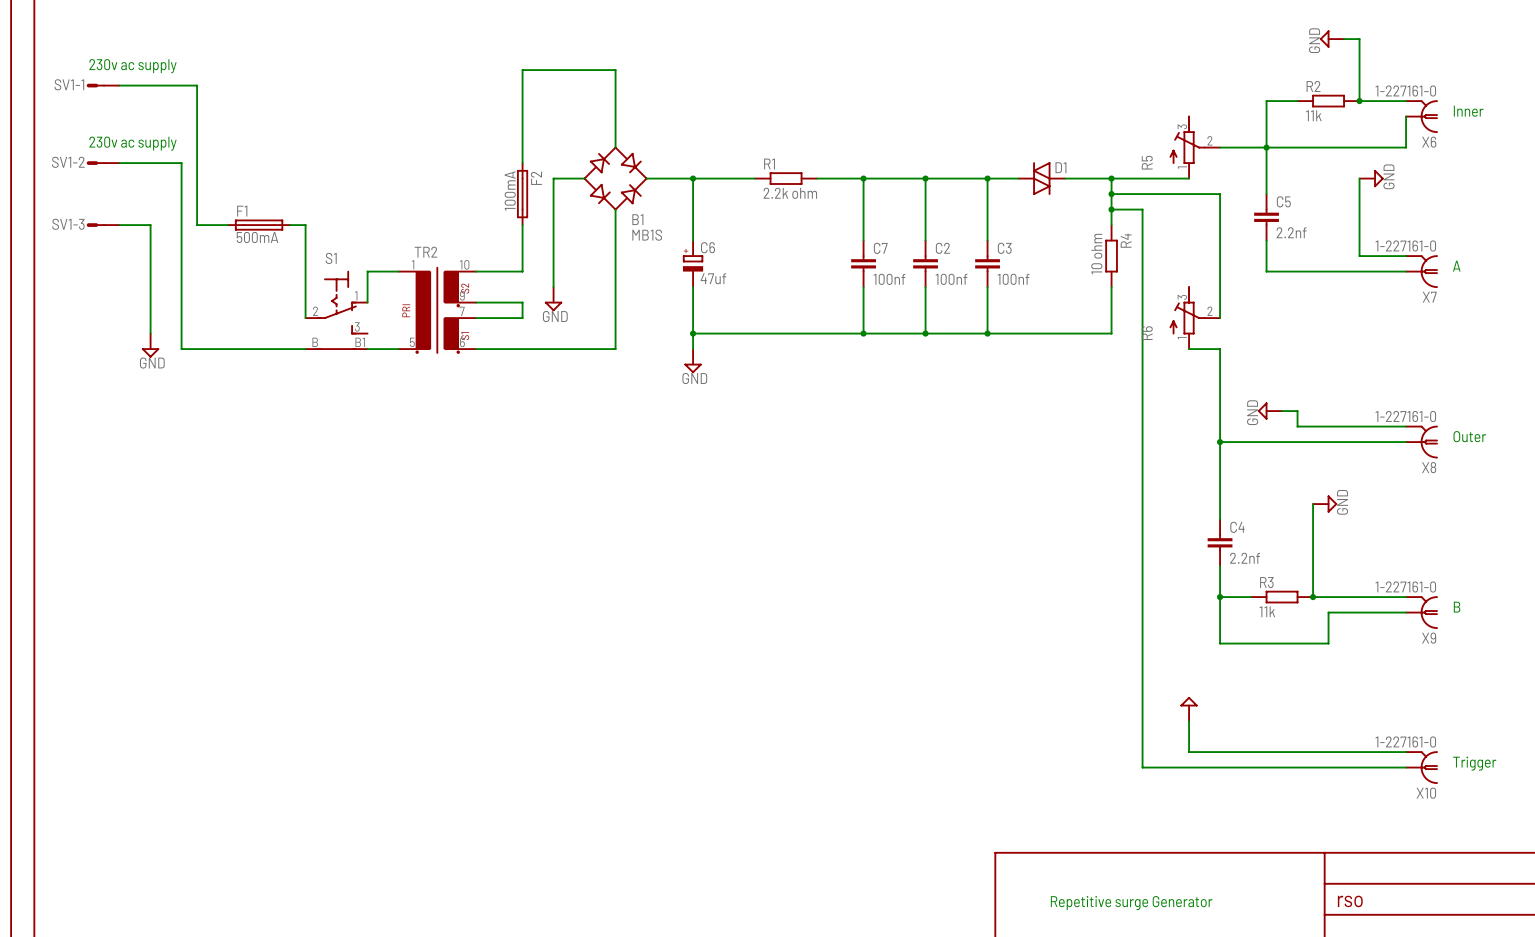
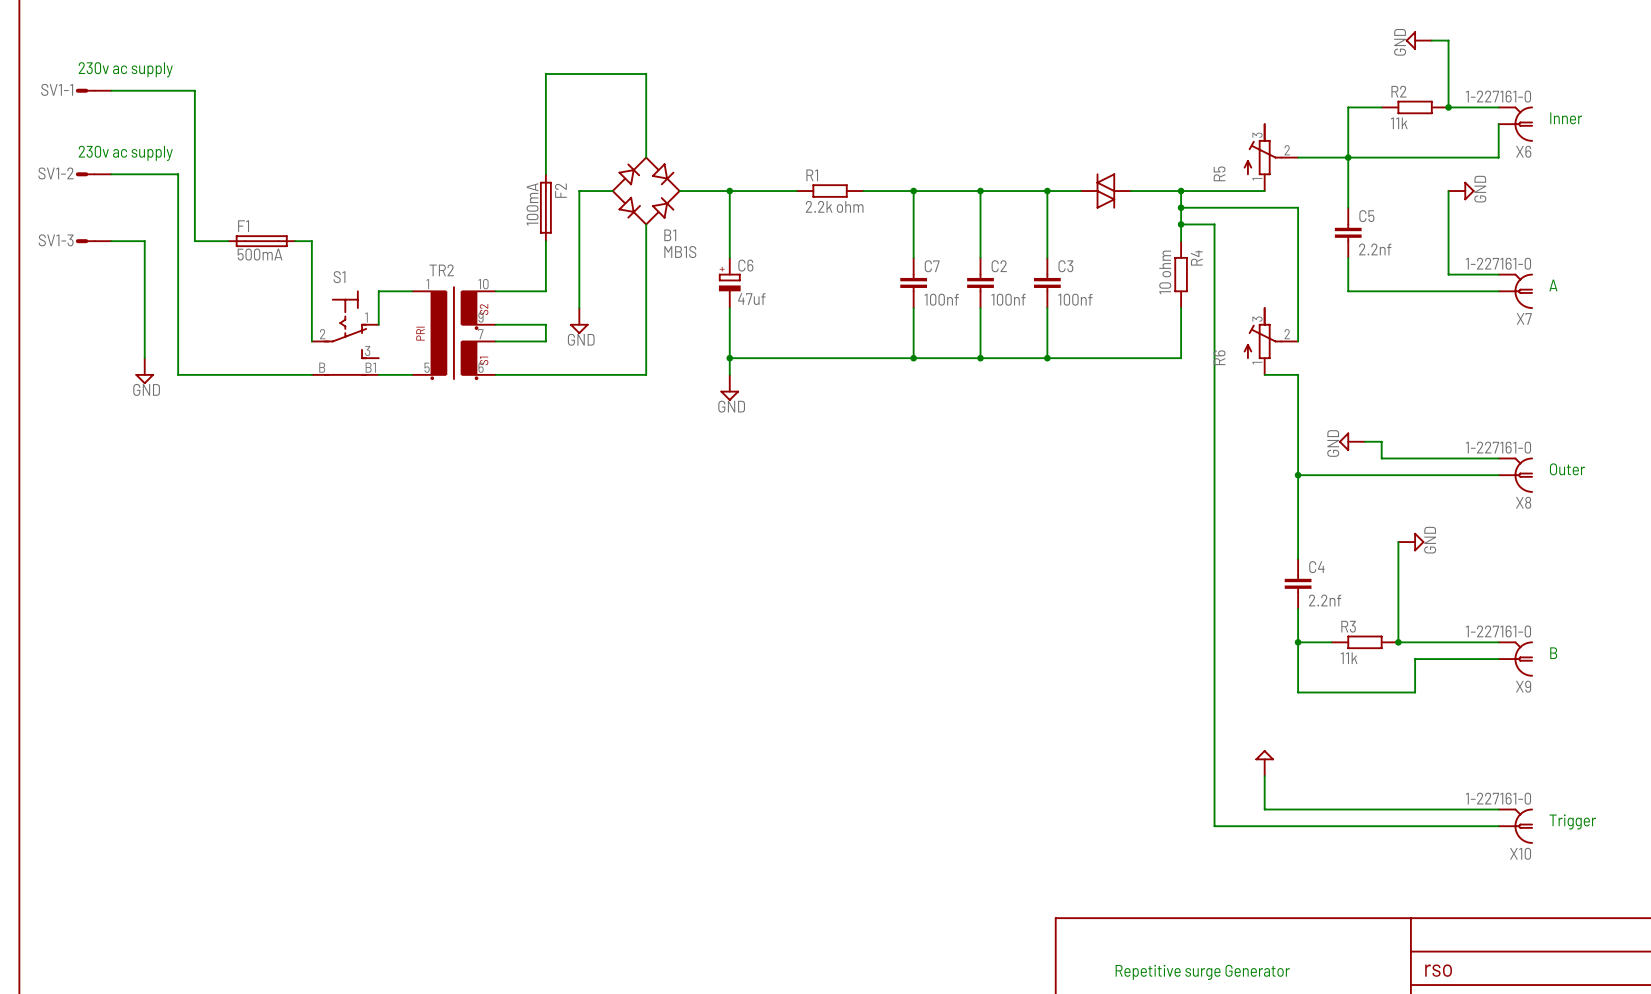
D1 name: D1 (1060, 167) -> none

